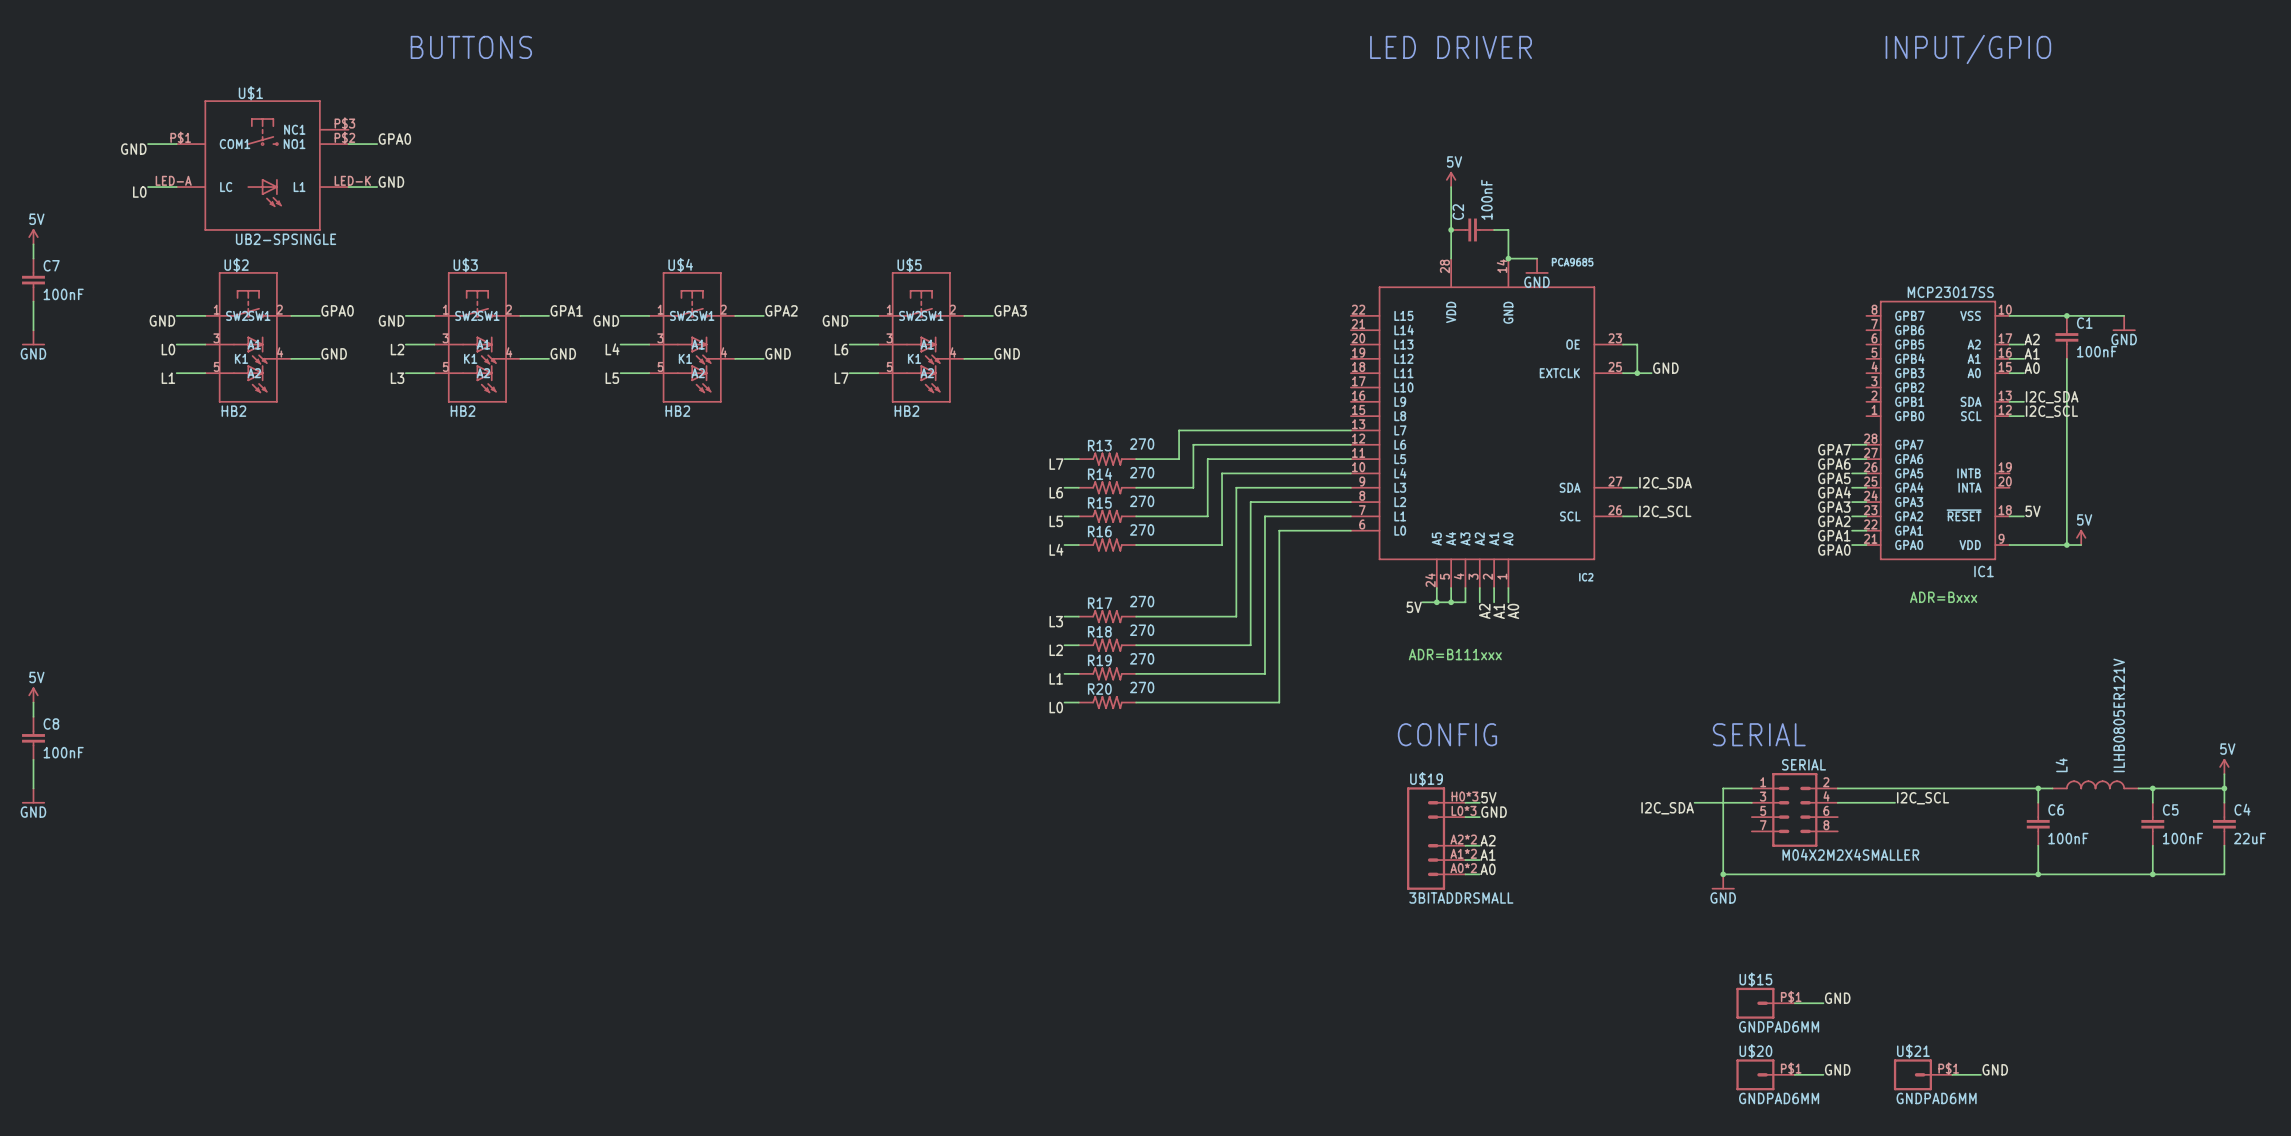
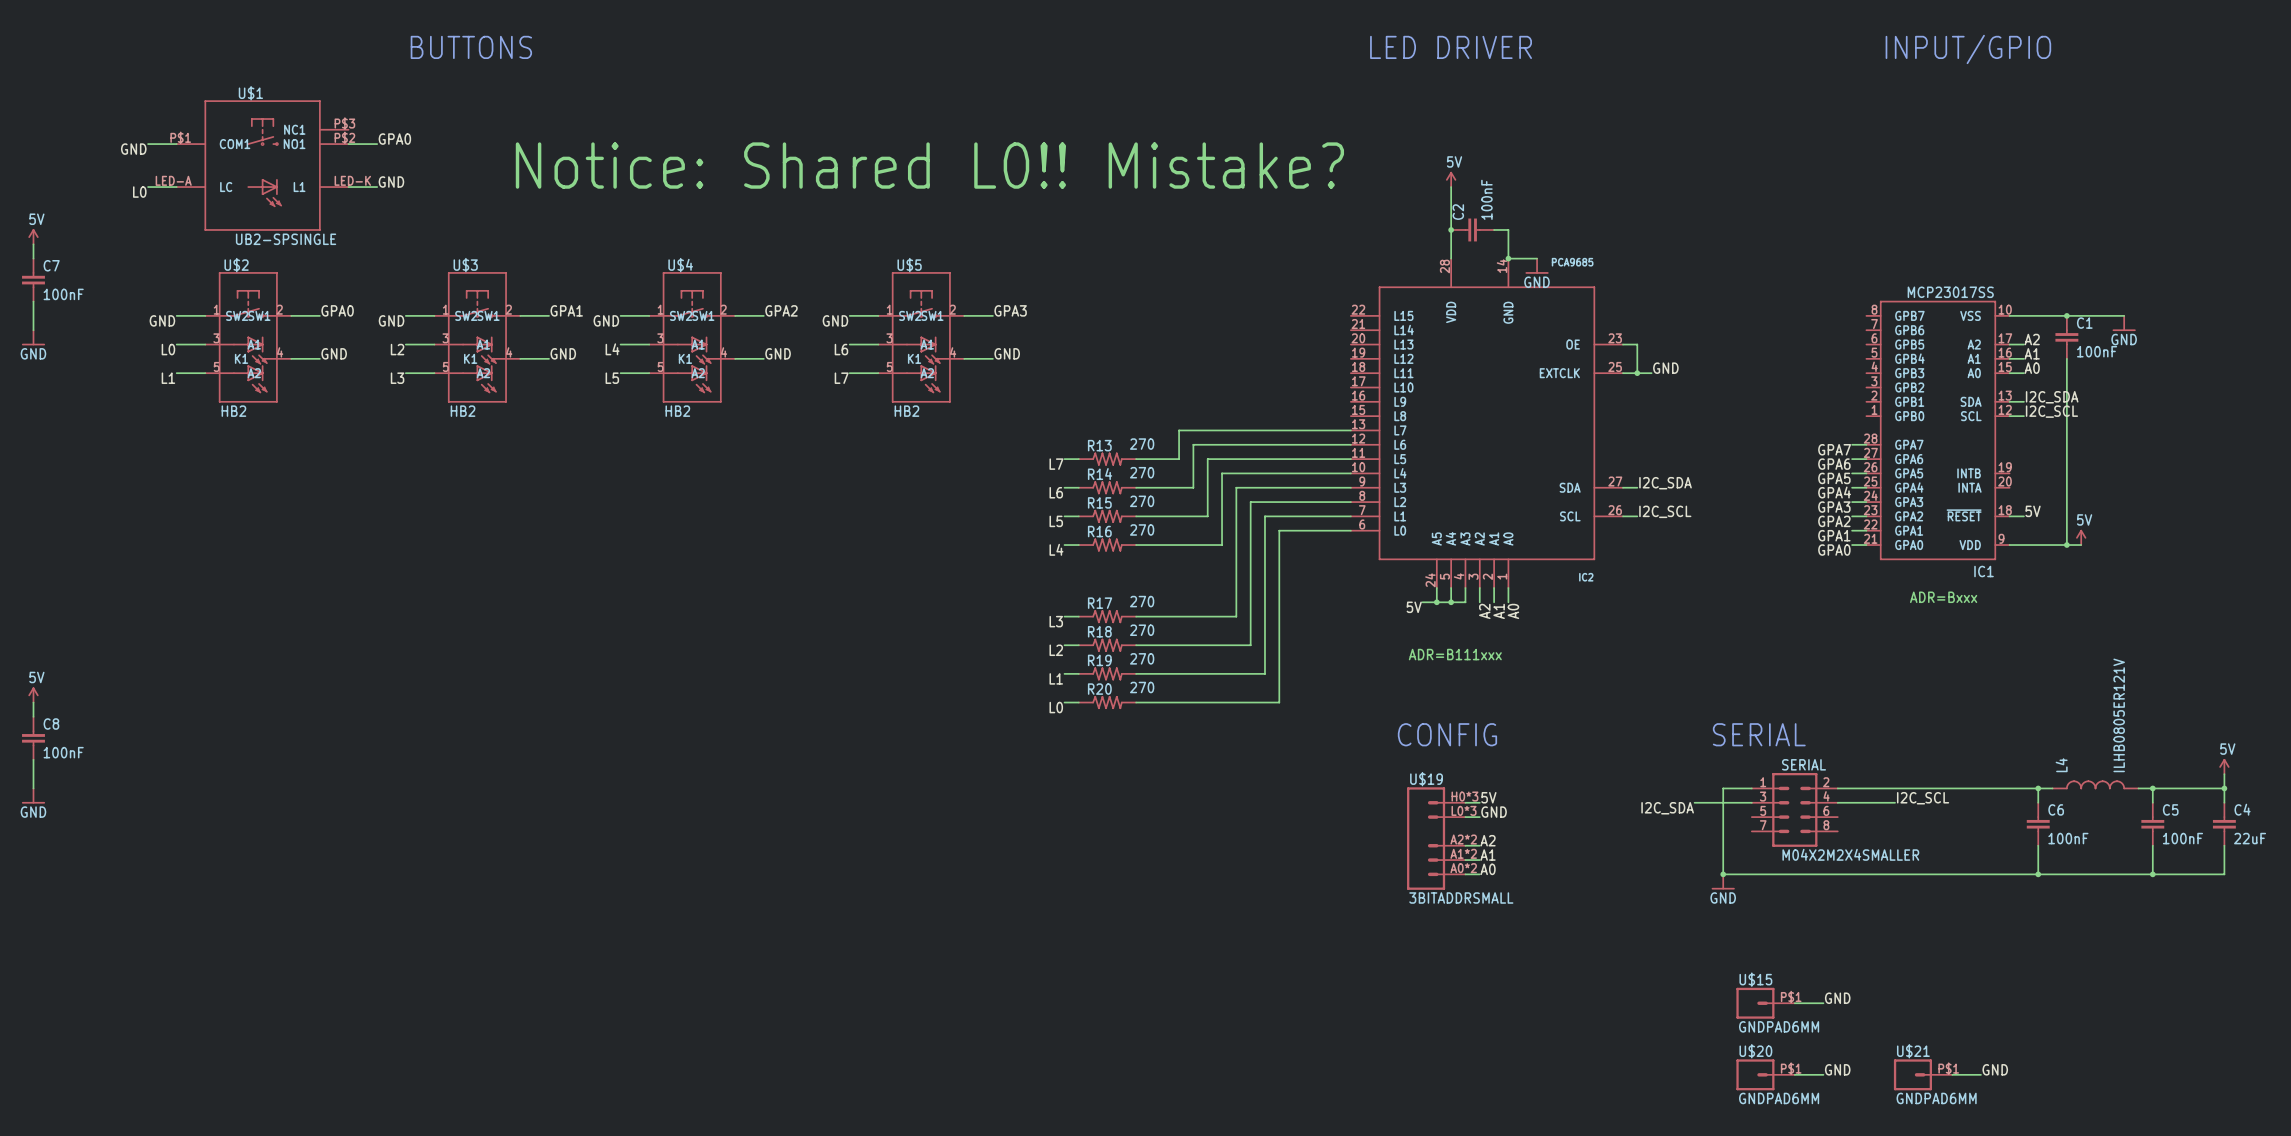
text: none -> Notice: Shared L0!! Mistake? (929, 165)

